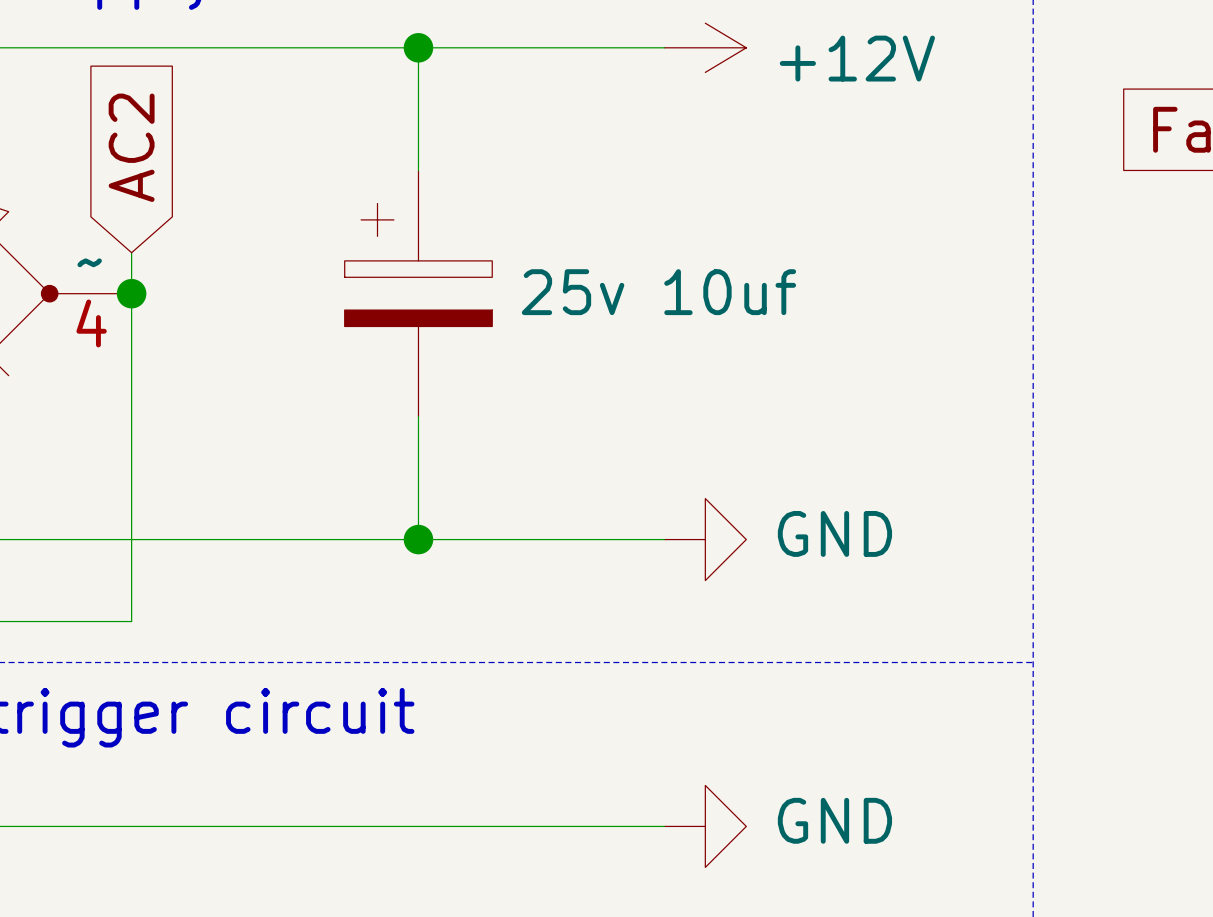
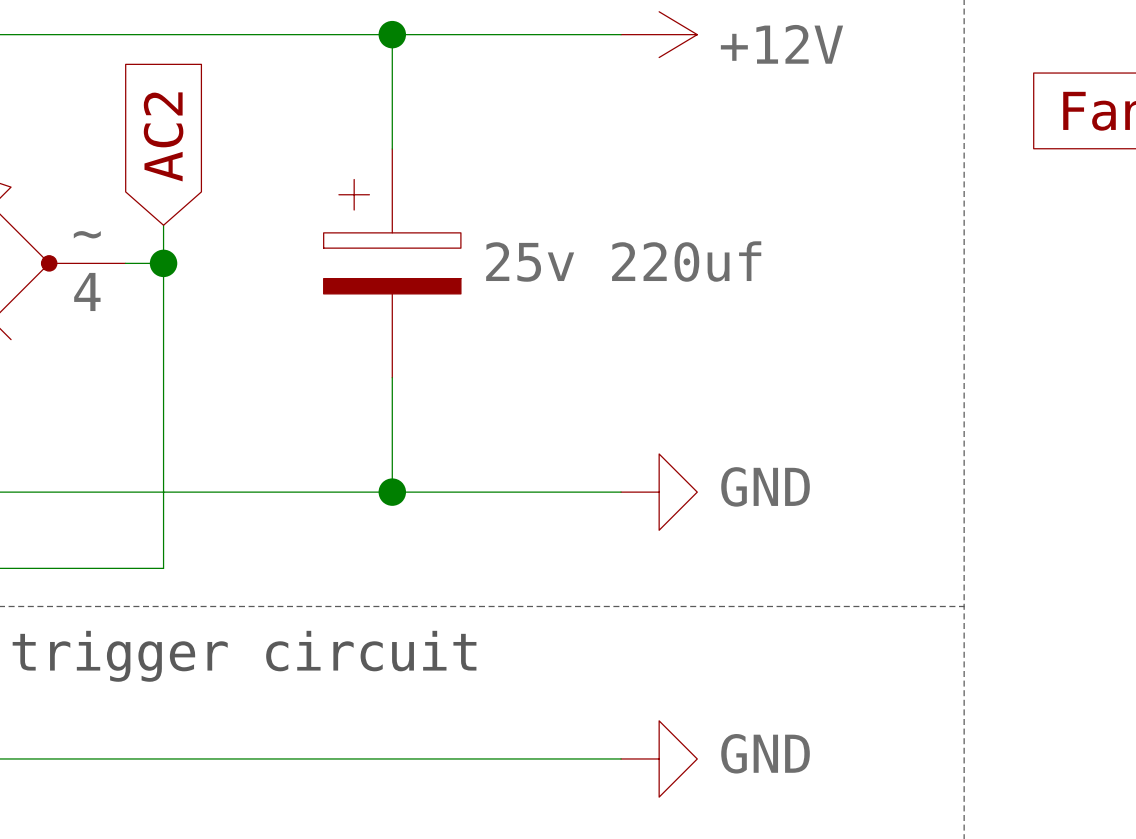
global label position: AC2 (131, 147) -> AC2 (163, 136)
wire: (131, 252) (131, 621) -> (163, 225) (163, 568) (125, 568)
part value: 25v 10uf (658, 292) -> 25v 220uf (623, 261)
wire: none -> (125, 263) (163, 263)
junction position: (131, 293) -> (163, 263)

